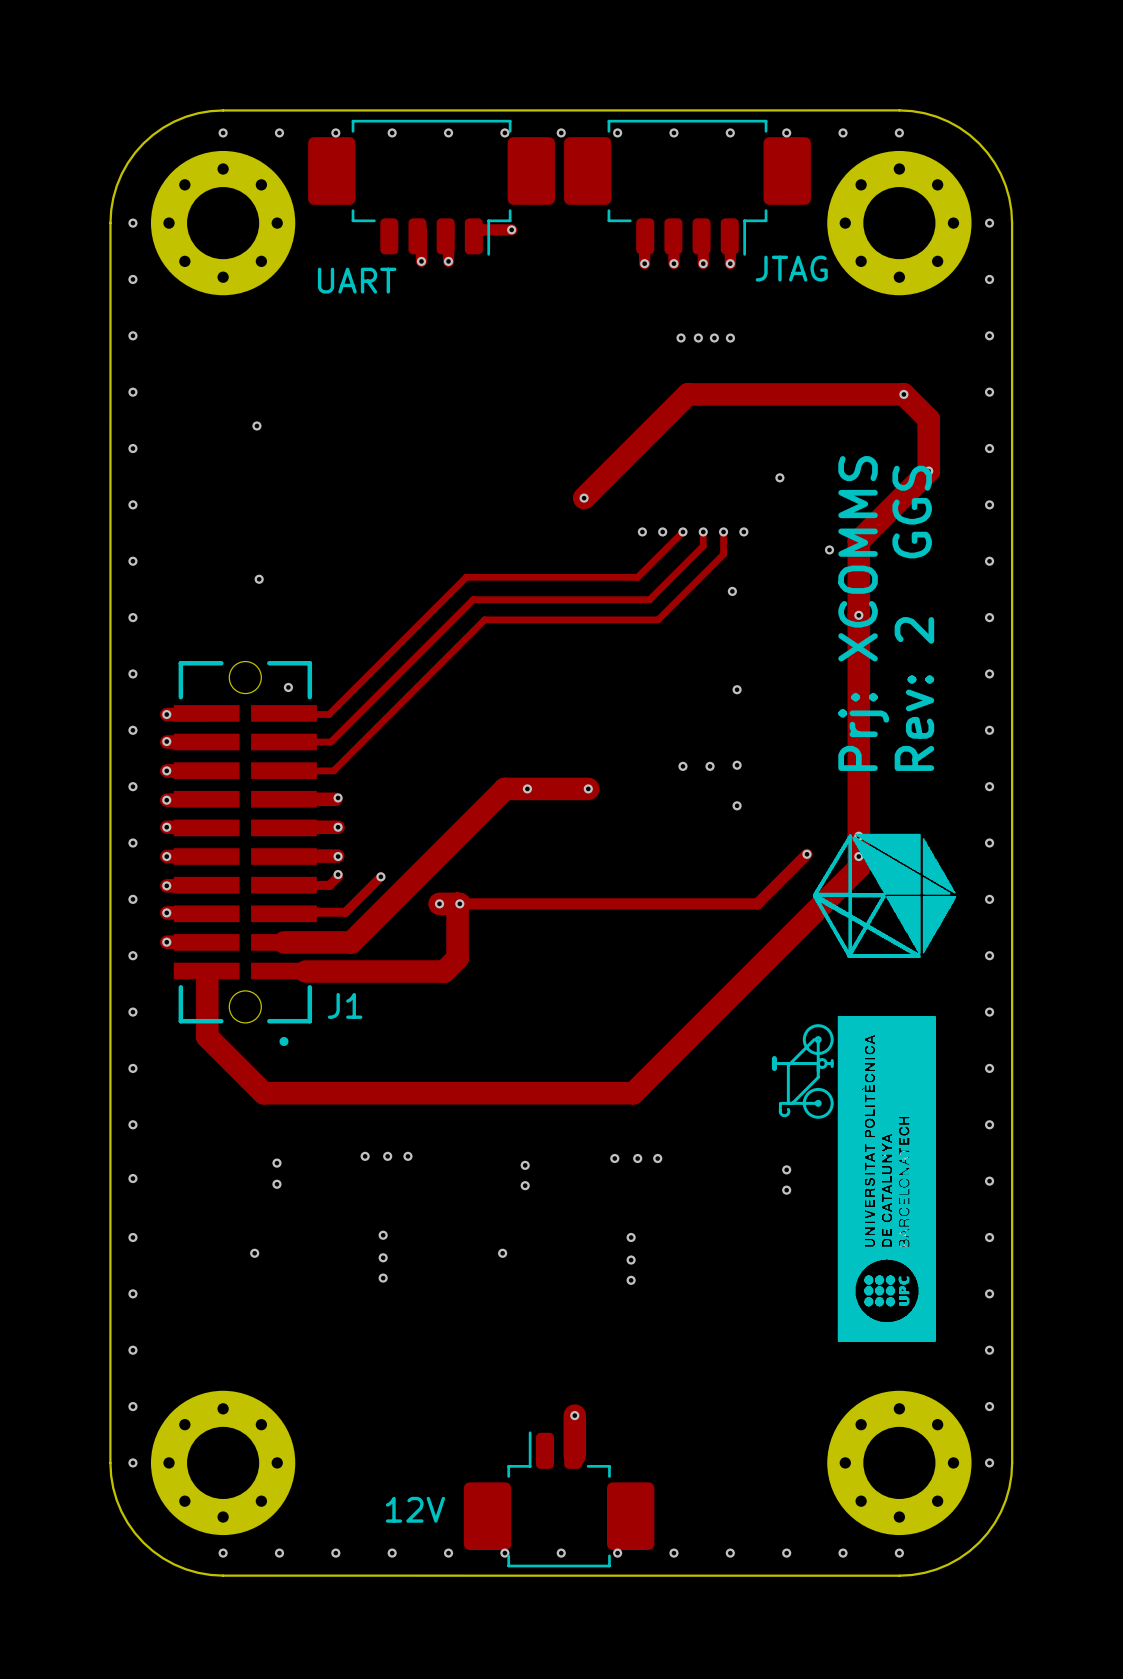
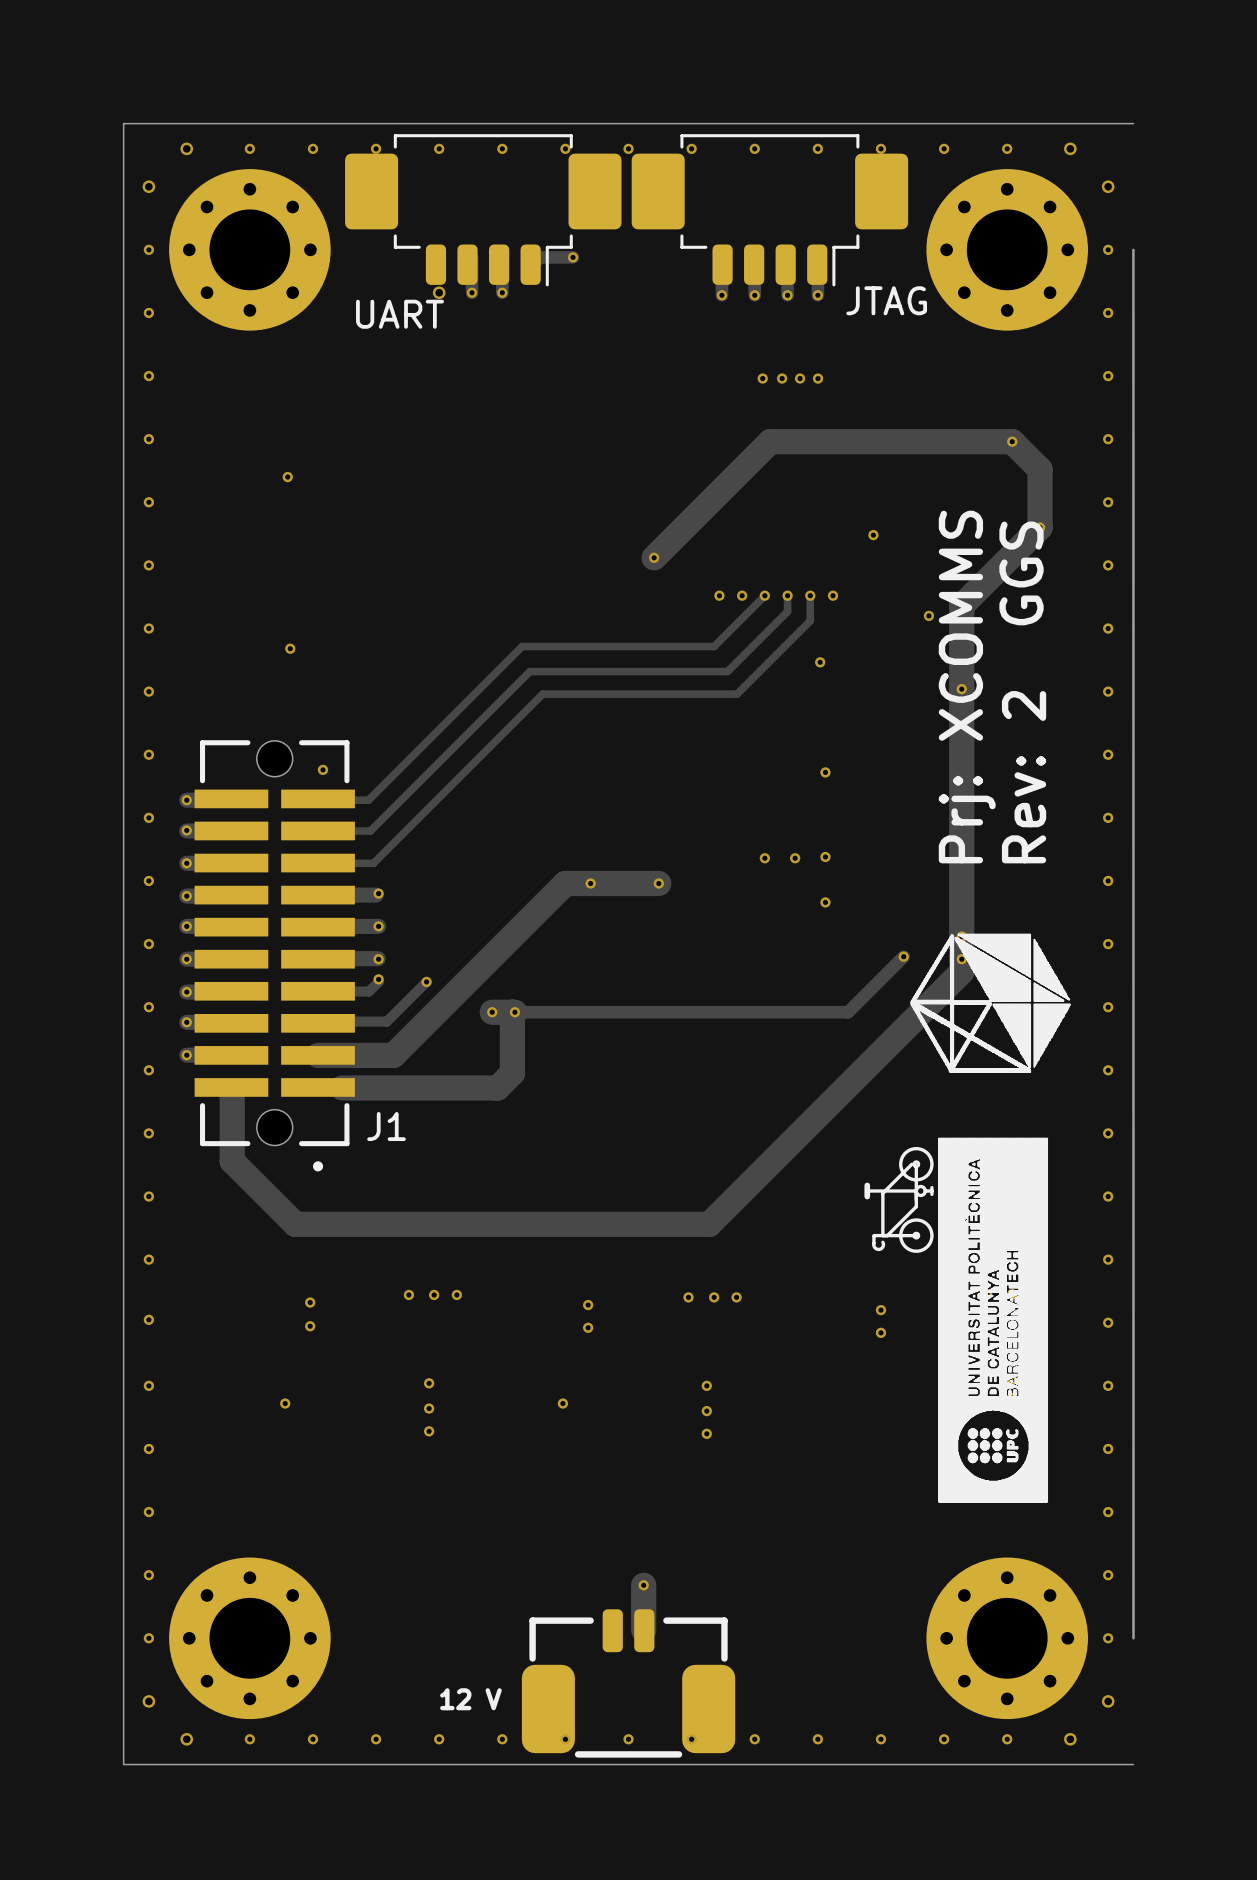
board edge: none -> (1133, 123) (123, 123) (123, 1764) (1133, 1764)
via: none -> (186, 148)
via: none -> (1070, 148)
via: none -> (148, 186)
via: none -> (1108, 186)
board edge: (1012, 223) (1009, 198) (1000, 174) (979, 143) (948, 121) (912, 111) (223, 110) (198, 113) (174, 121) (152, 135) (135, 152) (116, 185) (110, 223) (110, 1462) (113, 1488) (121, 1511) (143, 1542) (174, 1564) (210, 1574) (899, 1575) (936, 1569) (959, 1558) (979, 1542) (994, 1522) (1005, 1500) (1012, 1462) -> none
via: none -> (439, 292)
12V: (559, 1499) -> none
12 V: none -> (628, 1683)
via: none -> (148, 1701)
via: none -> (1108, 1701)
via: none -> (186, 1739)
via: none -> (1070, 1739)

